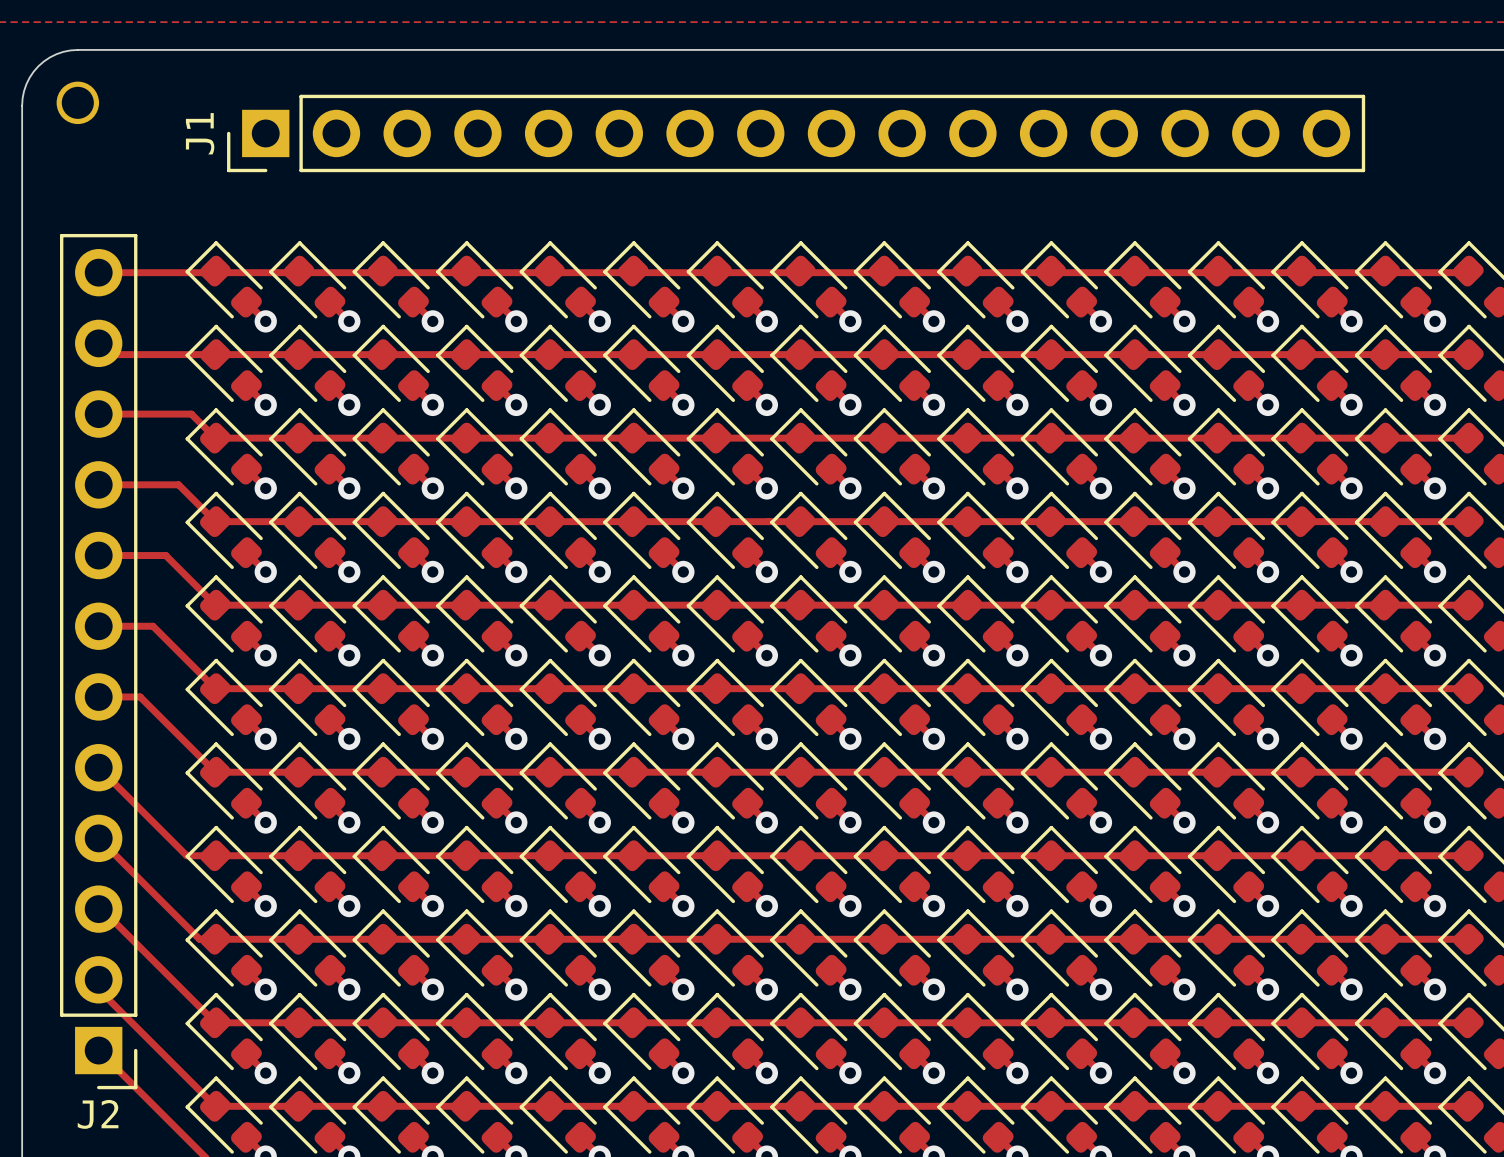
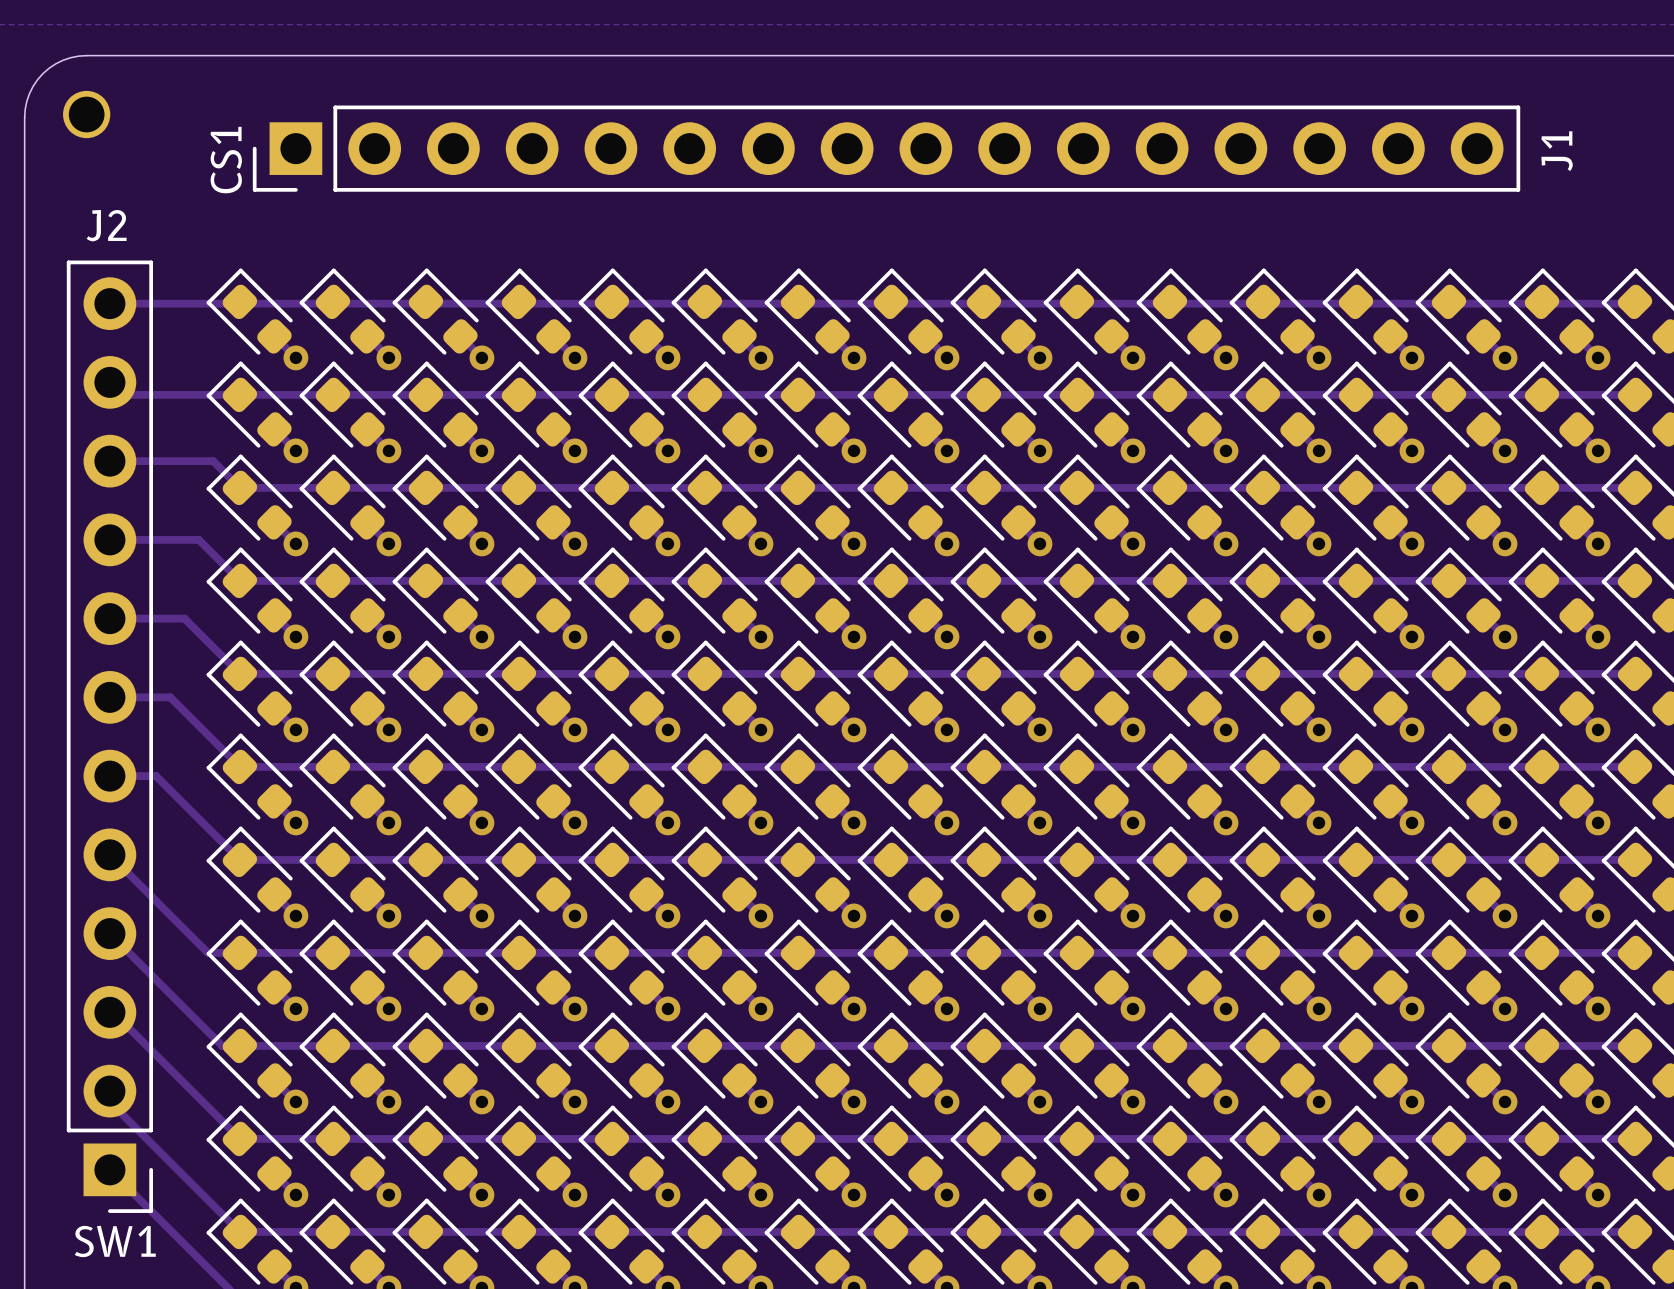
J1 name position: J1 (200, 133) -> J1 (1557, 151)
text: none -> CS1 (226, 160)
J2 name position: J2 (98, 1114) -> J2 (106, 225)
text: none -> SW1 (115, 1241)

